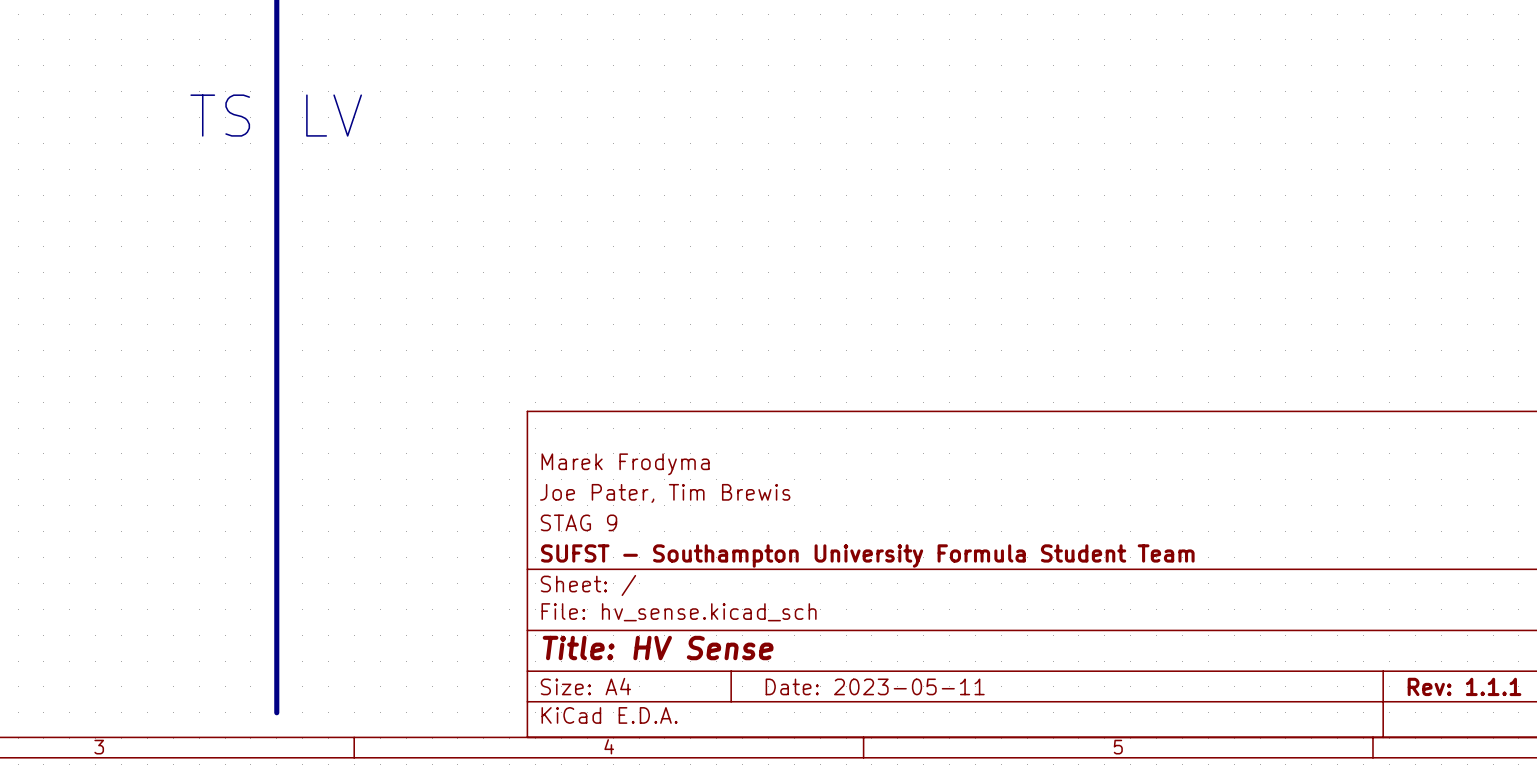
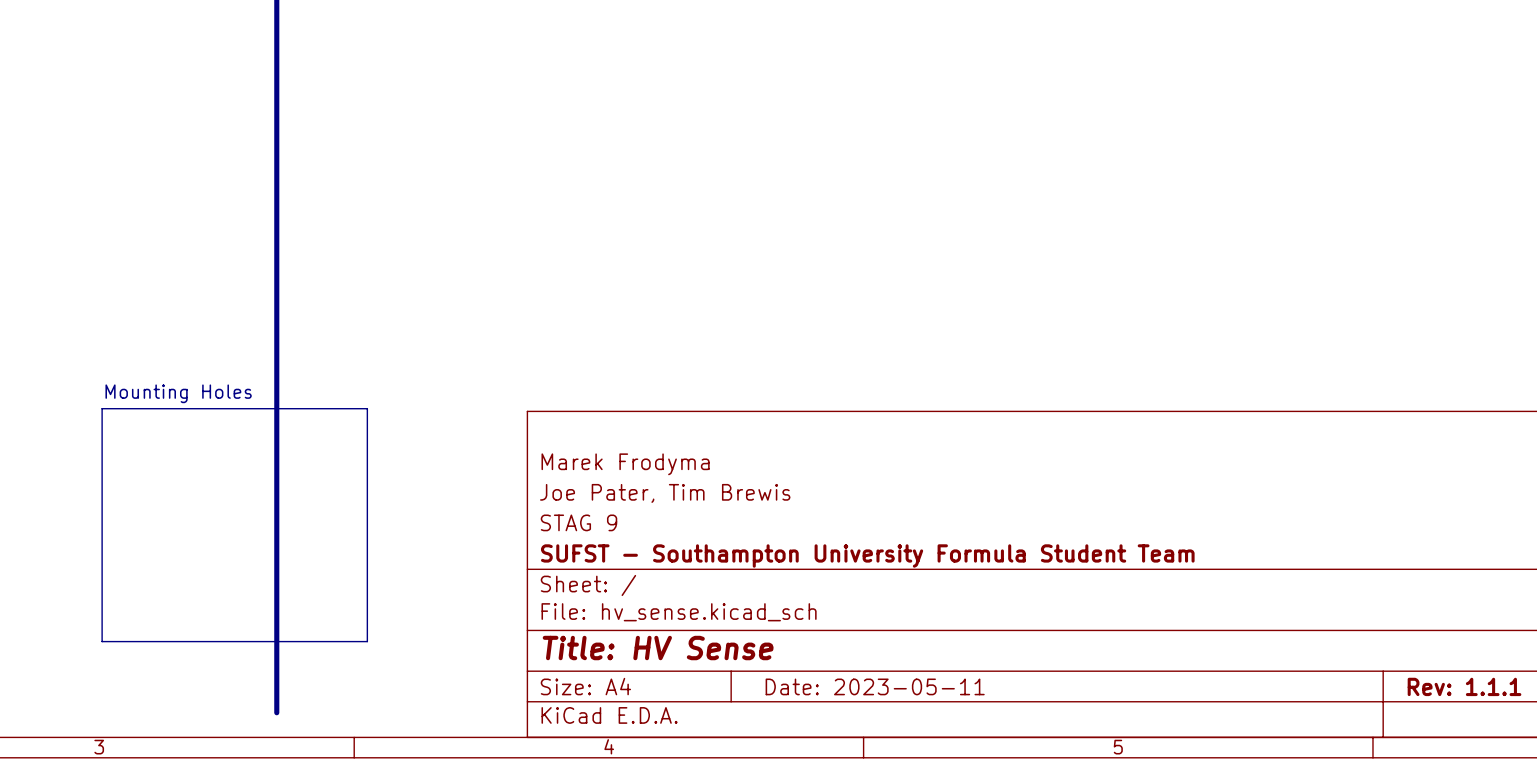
text: TS (220, 115) -> none
text: LV (334, 115) -> none
text: none -> Mounting Holes (178, 393)
line: none -> (102, 408) (102, 641) (367, 641) (367, 408) (102, 408)

